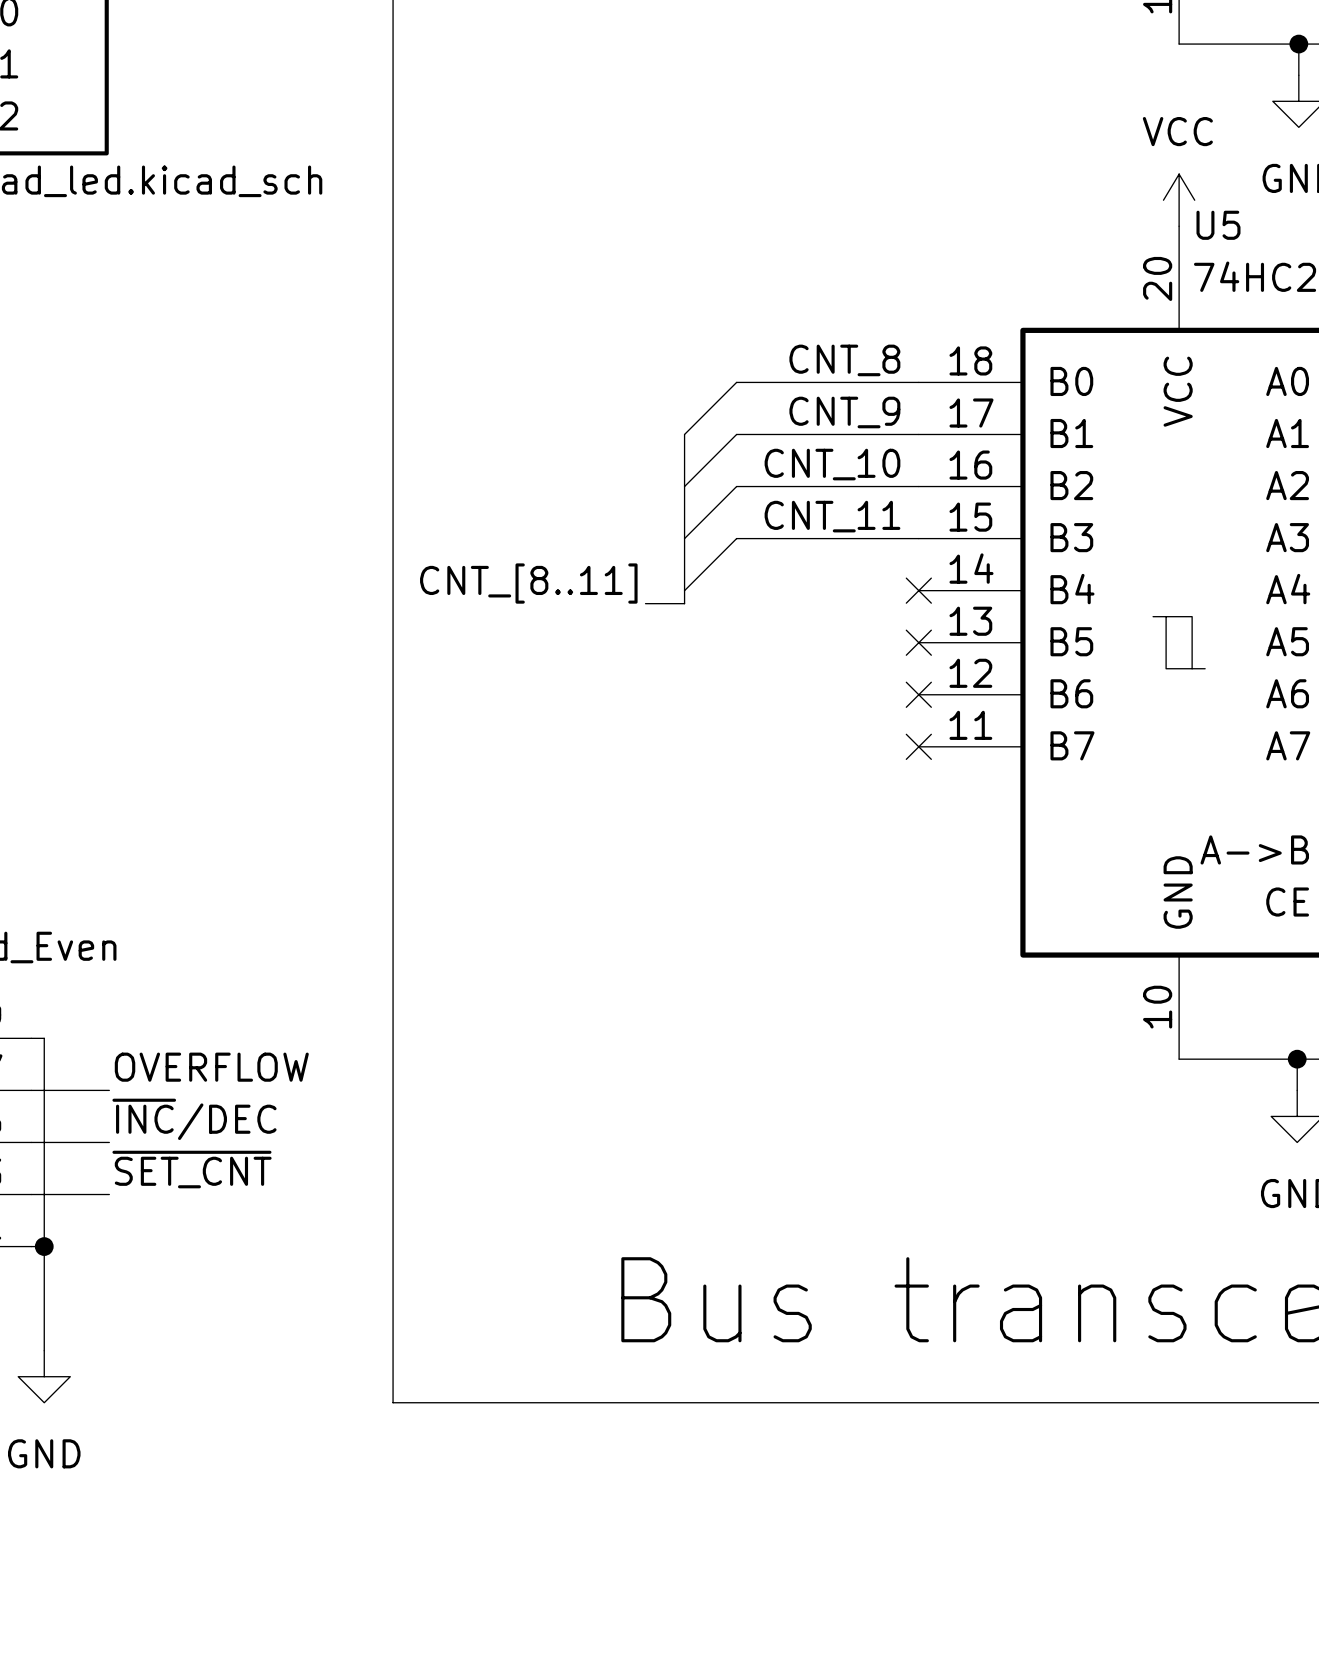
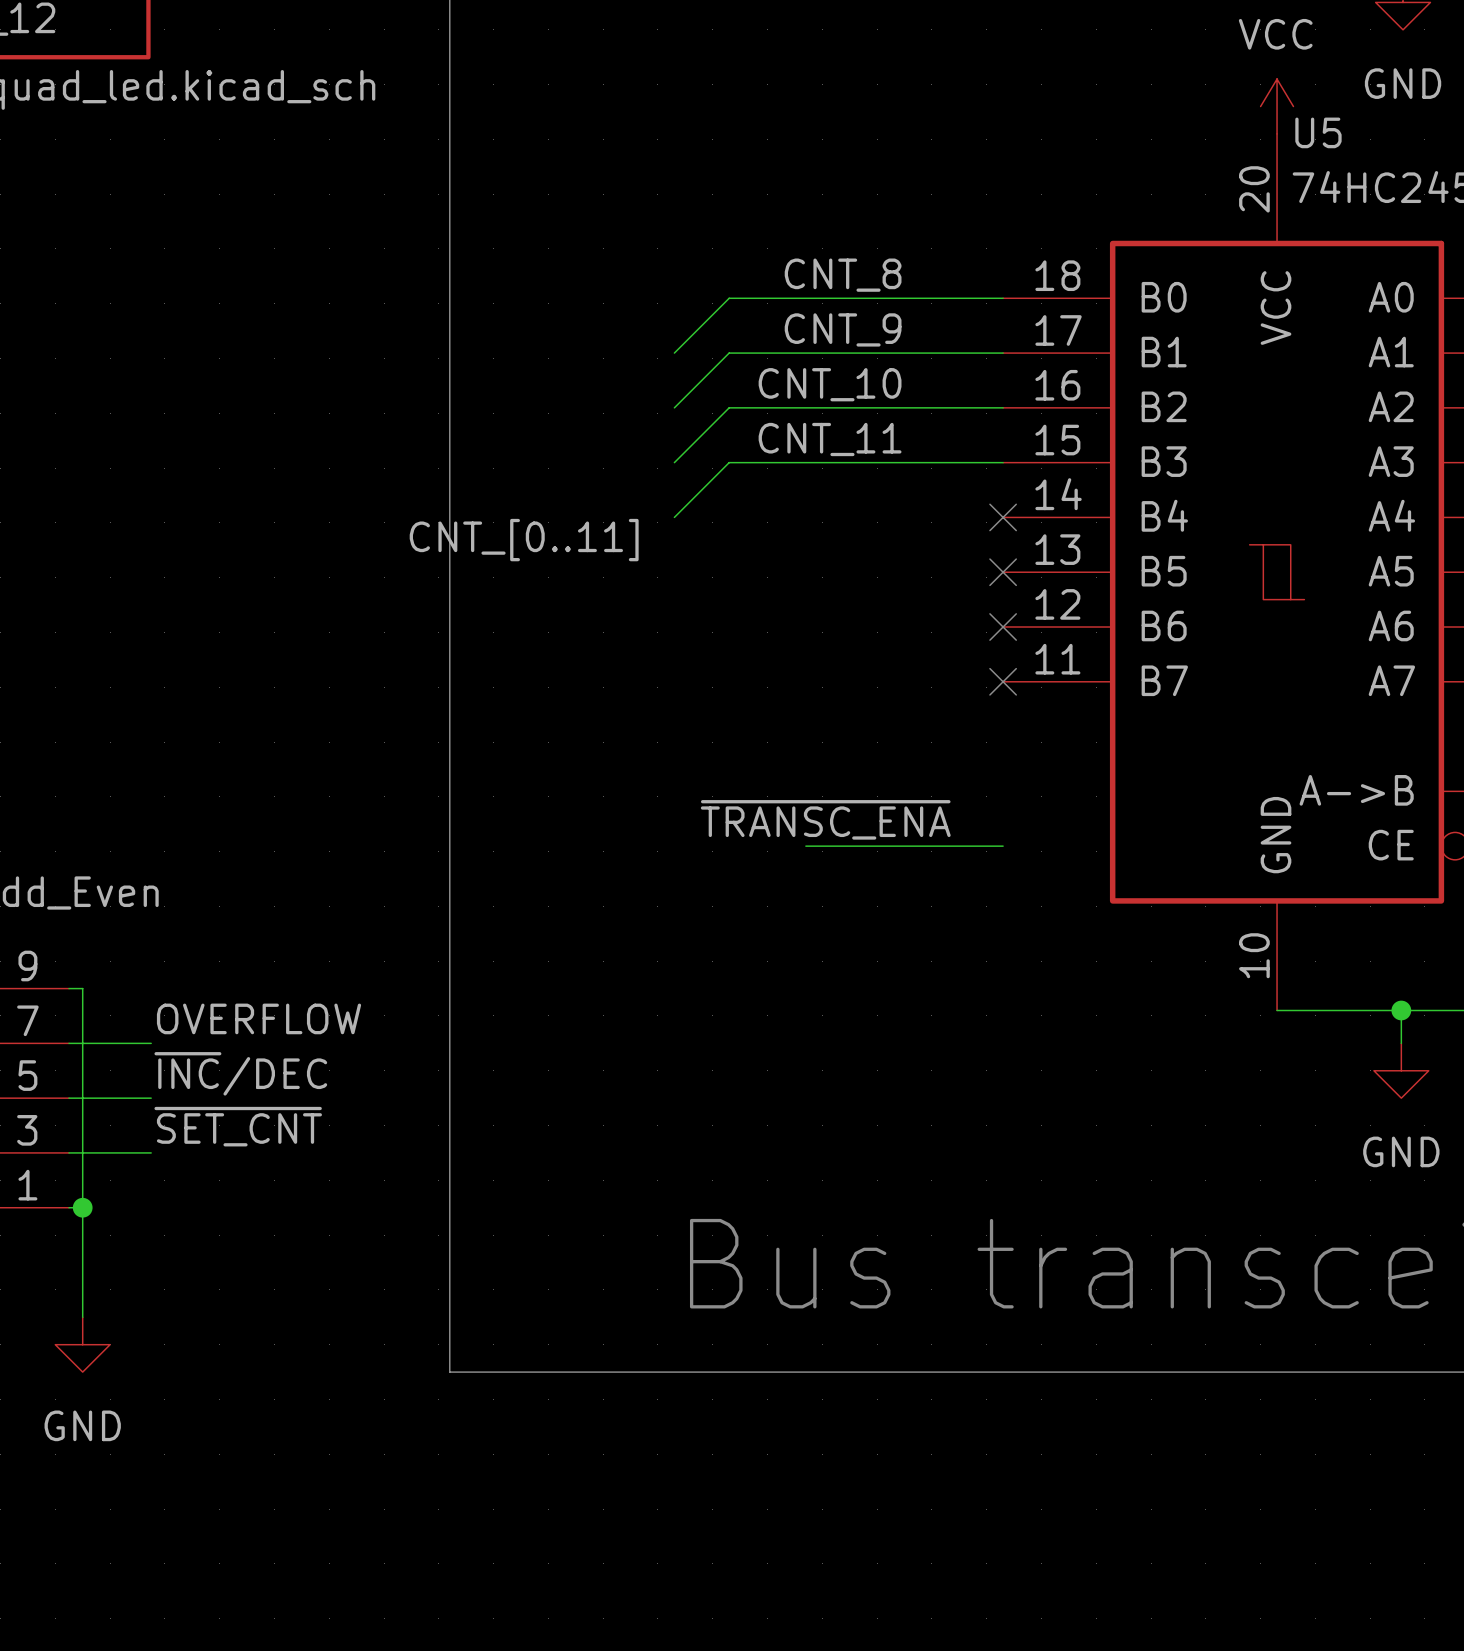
label position: CNT_8 (844, 360) -> CNT_8 (843, 275)
wire: (736, 382) (684, 434) -> (811, 298) (729, 298) (674, 353)
label position: CNT_9 (844, 412) -> CNT_9 (843, 329)
bus: (684, 434) (684, 603) (645, 603) -> none
wire: (736, 434) (684, 486) -> (811, 353) (729, 353) (674, 407)
label position: CNT_10 (832, 464) -> CNT_10 (830, 384)
wire: (736, 486) (684, 538) -> (811, 407) (729, 407) (674, 462)
label position: CNT_11 (832, 516) -> CNT_11 (830, 439)
wire: (736, 538) (684, 590) -> (811, 462) (729, 462) (674, 517)
label: CNT_[8..11] (528, 583) -> CNT_[0..11] (524, 540)
label: none -> ~{TRANSC_ENA} (825, 819)
wire: none -> (805, 846) (1003, 846)

